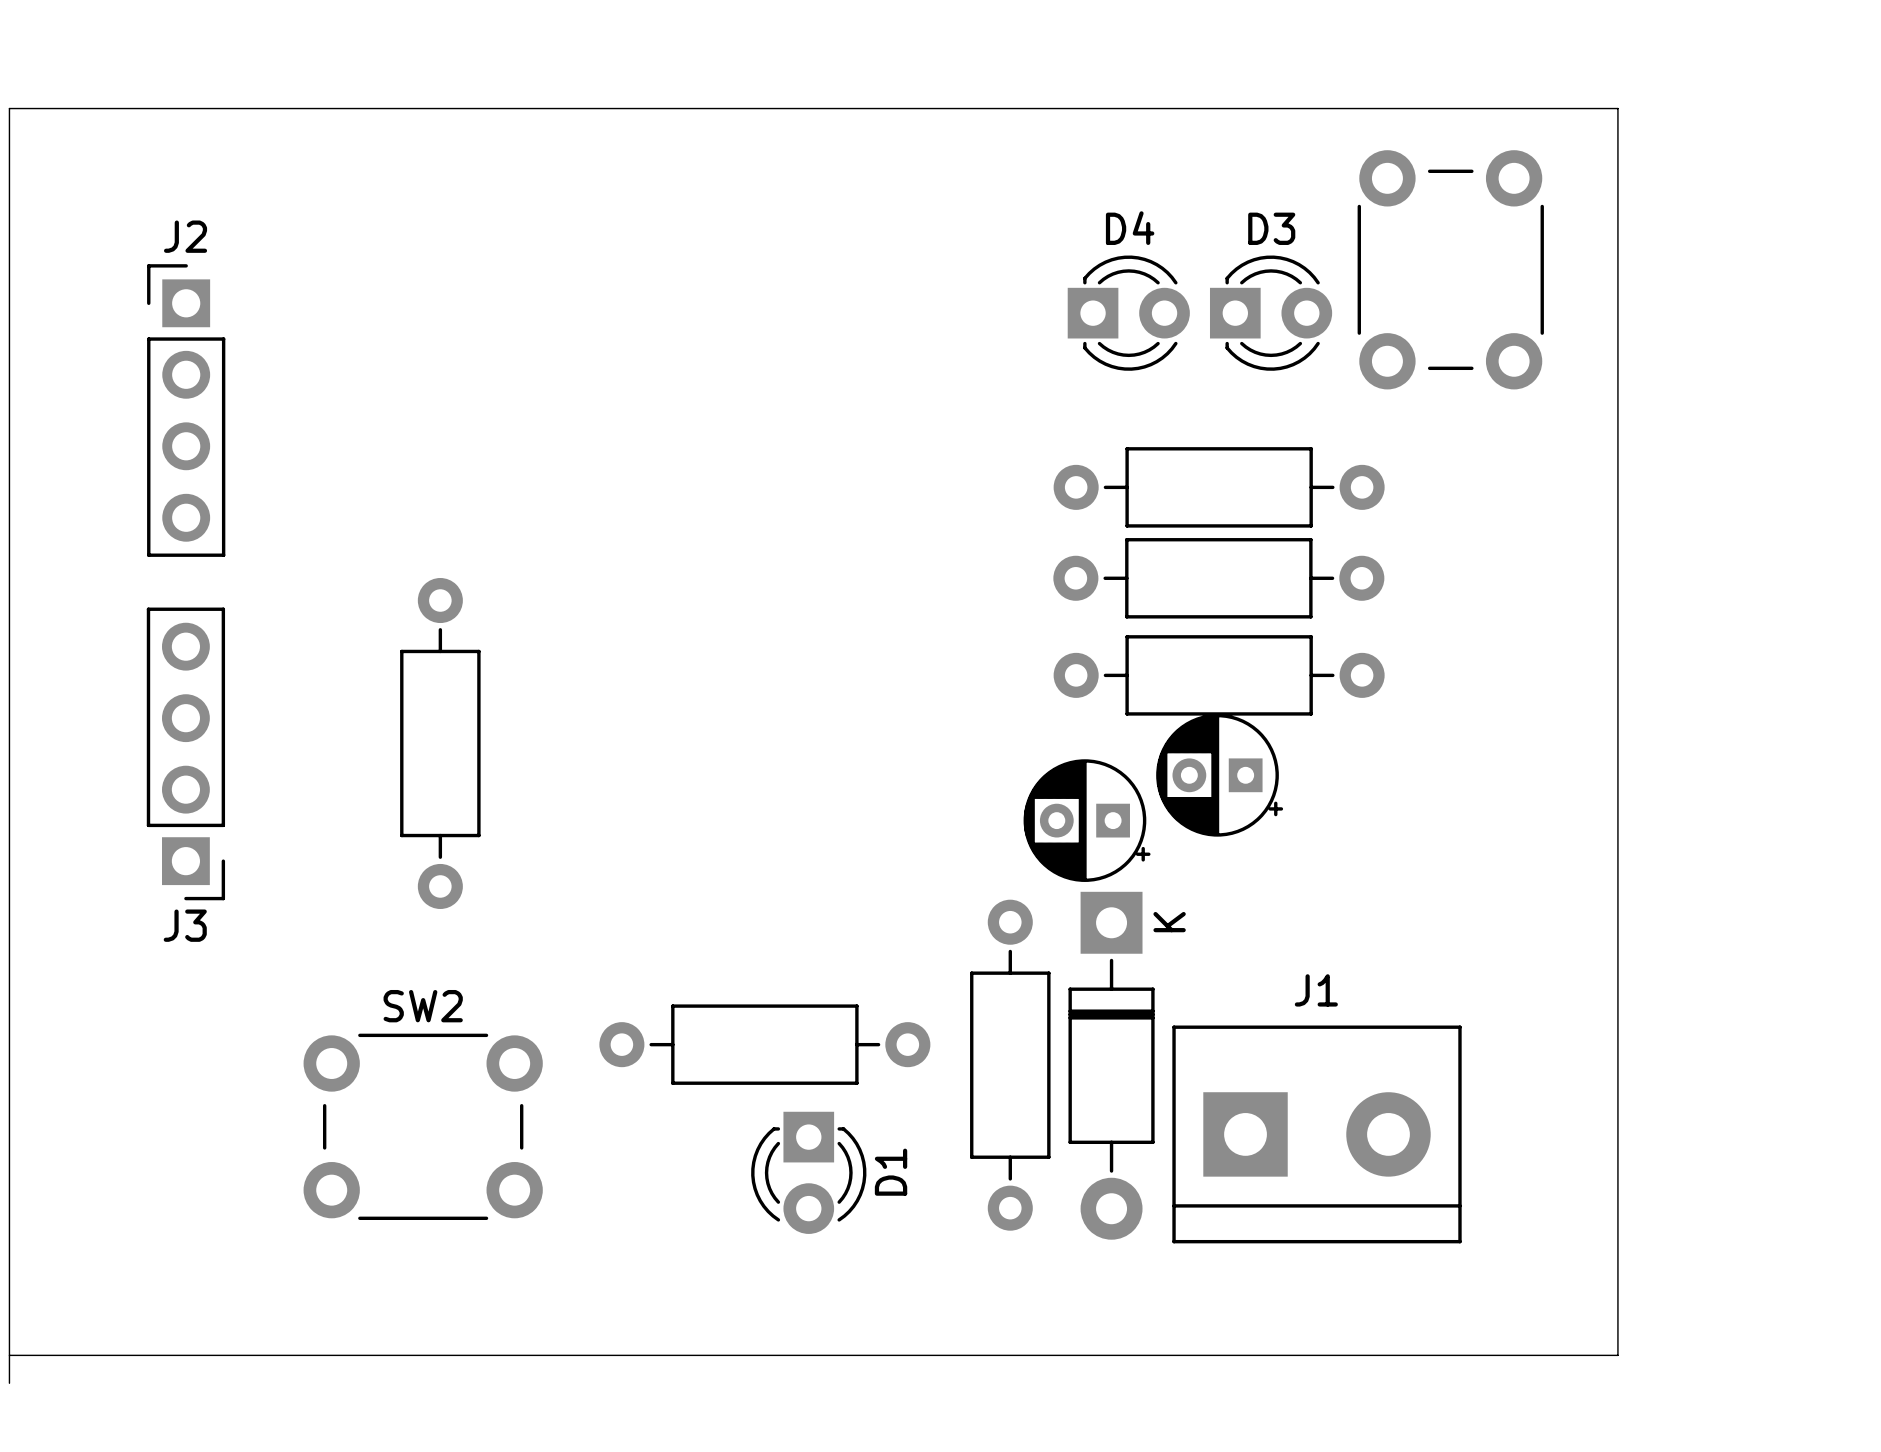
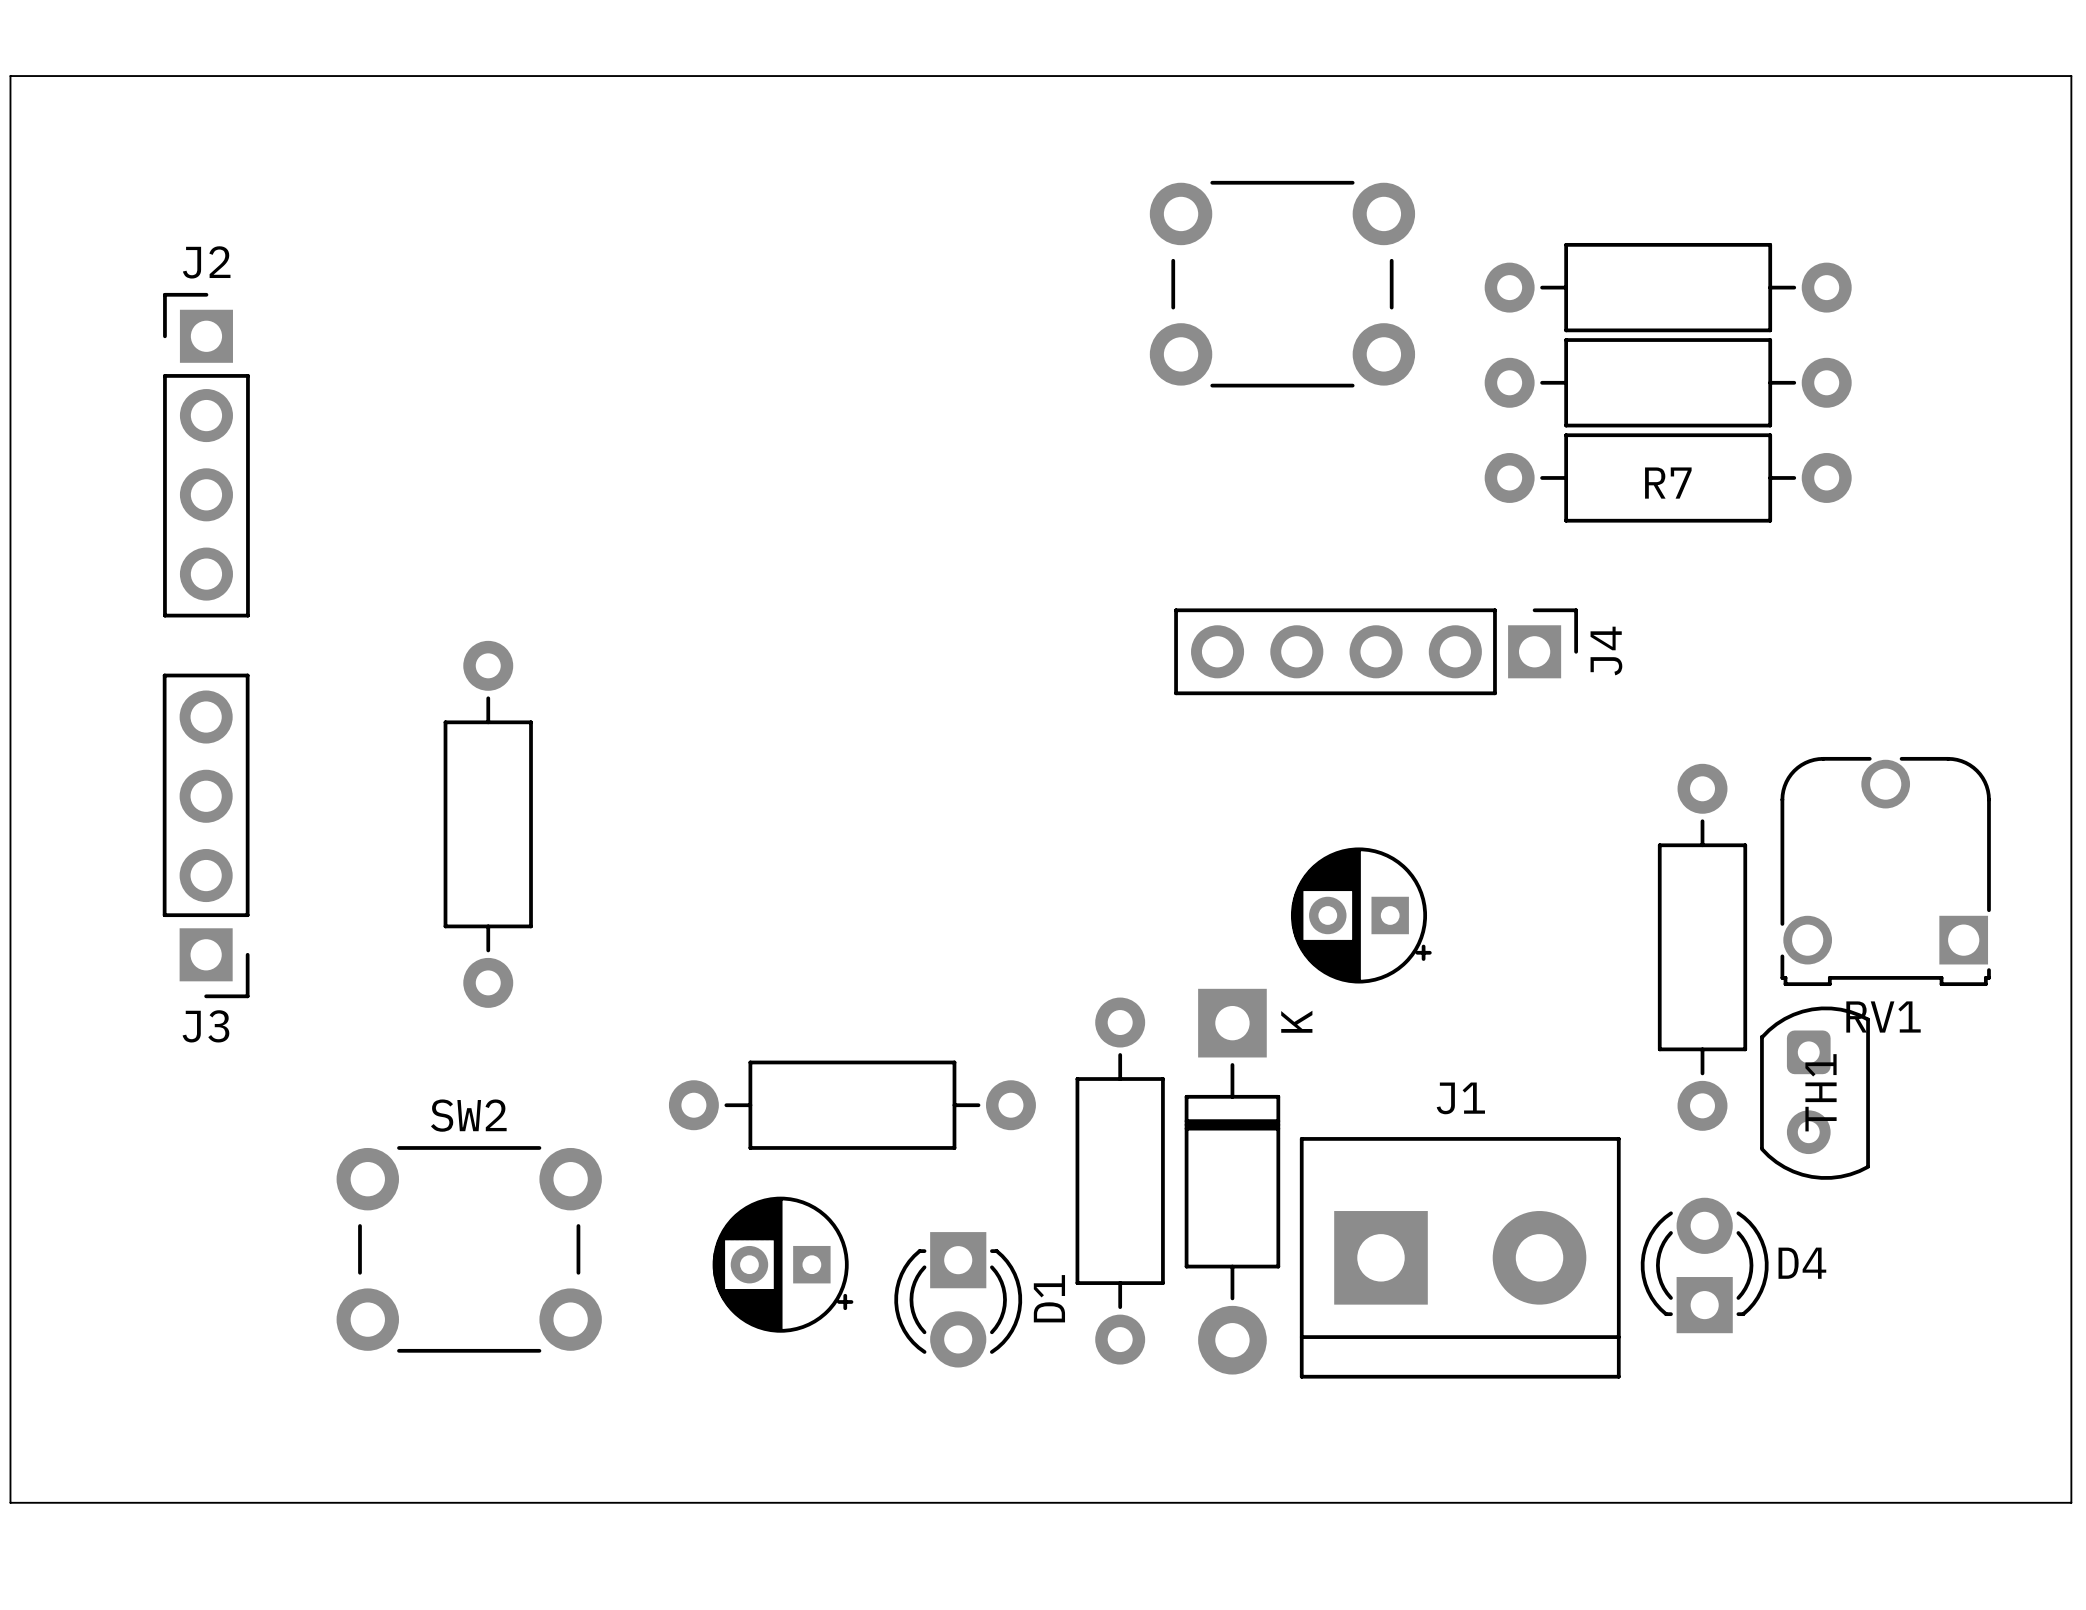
board edge: (9, 108) (1617, 108) (1617, 1355) -> (10, 120) (10, 76) (2071, 76) (2071, 1502) (1793, 1502)
D4 name position: D4 (1130, 228) -> D4 (1802, 1263)
part: none -> (1668, 287)
part rotation: 0° (1450, 269) -> 90° clockwise (1282, 284)
part position: (1450, 269) -> (1282, 284)
D4 rotation: 0° (1128, 313) -> 90° counterclockwise (1704, 1265)
D4 position: (1128, 313) -> (1704, 1265)
D3: (1271, 313) -> none
part: none -> (1668, 382)
R7: none -> (1668, 477)
part: (1219, 487) -> none
part: (1218, 578) -> none
J4: none -> (1376, 651)
part: (1219, 675) -> none
part position: (1219, 775) -> (1361, 915)
RV1: none -> (1885, 871)
part: (1087, 820) -> none
part: none -> (1702, 947)
TH1: none -> (1815, 1093)
part position: (764, 1044) -> (852, 1105)
part: none -> (782, 1264)
D1 position: (808, 1172) -> (958, 1299)
board edge: (9, 1355) (9, 1383) -> none

